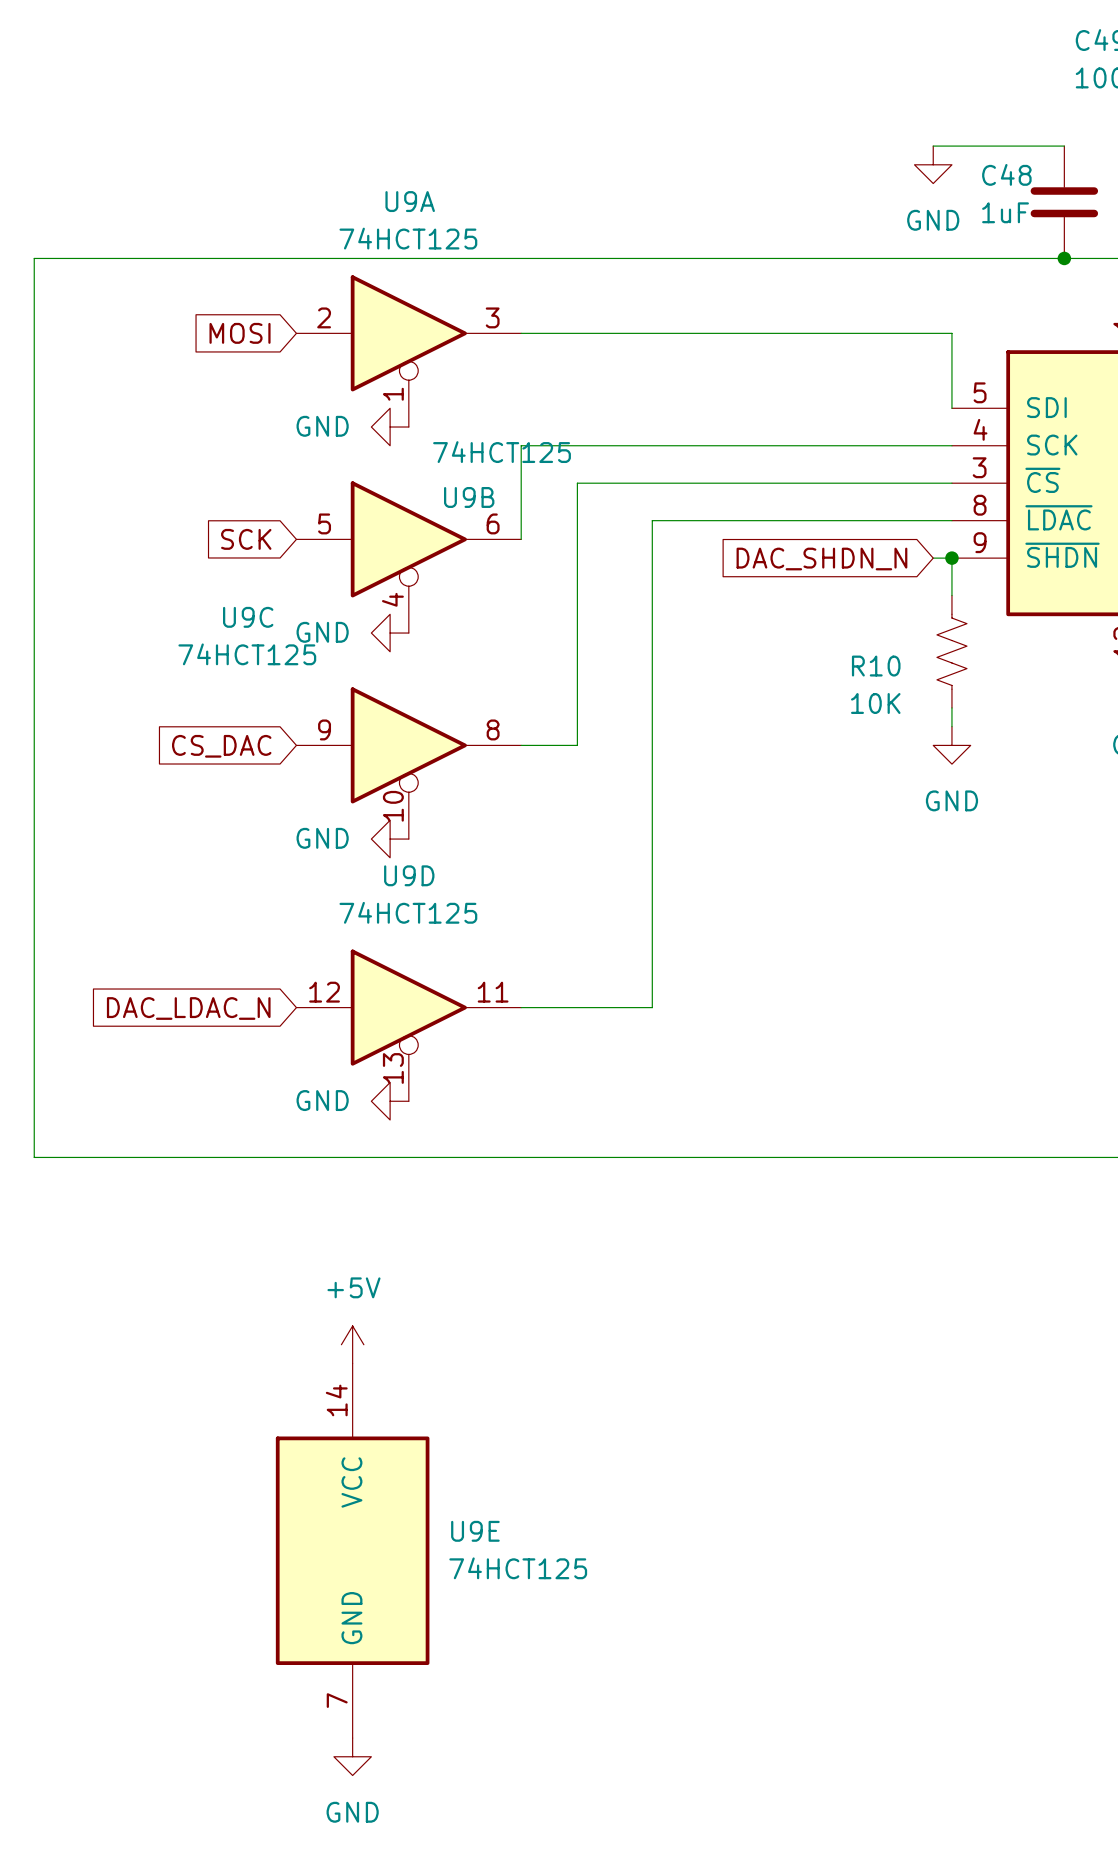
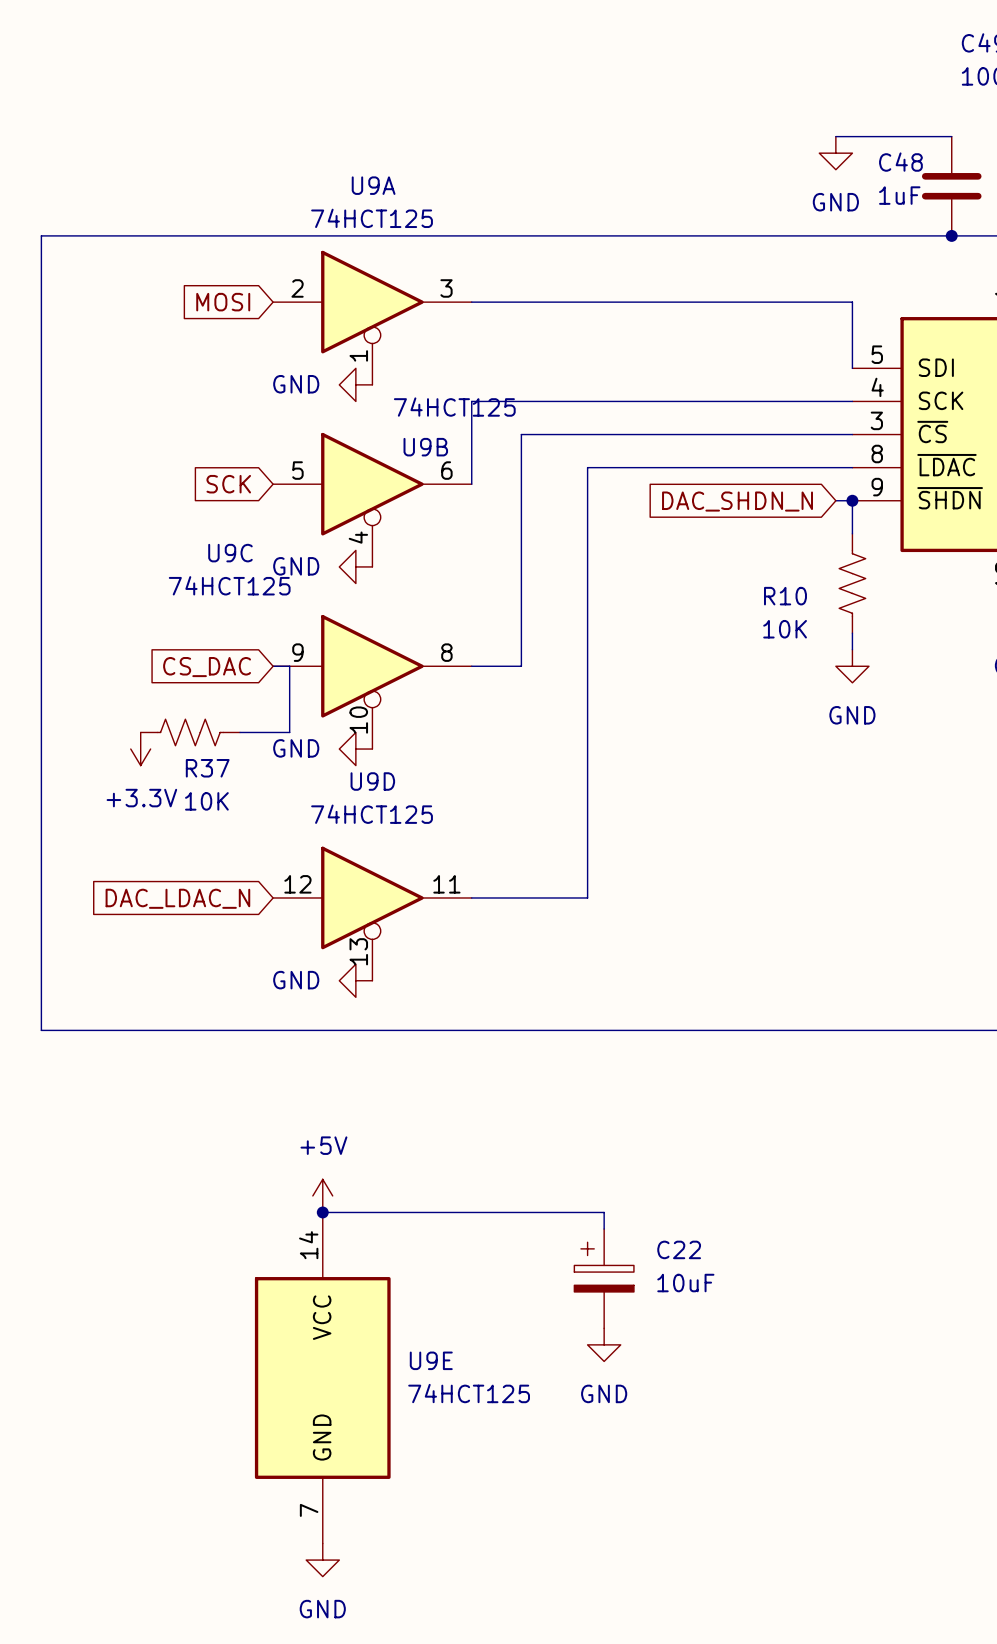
wire: none -> (273, 666) (289, 666) (289, 732) (240, 732)
R37: none -> 10K (190, 732)
power symbol: none -> +3.3V (140, 749)
wire: none -> (322, 1212) (604, 1212) (604, 1229)
junction: none -> (322, 1212)
C22: none -> 10uF (604, 1278)
power symbol: none -> GND (604, 1344)

